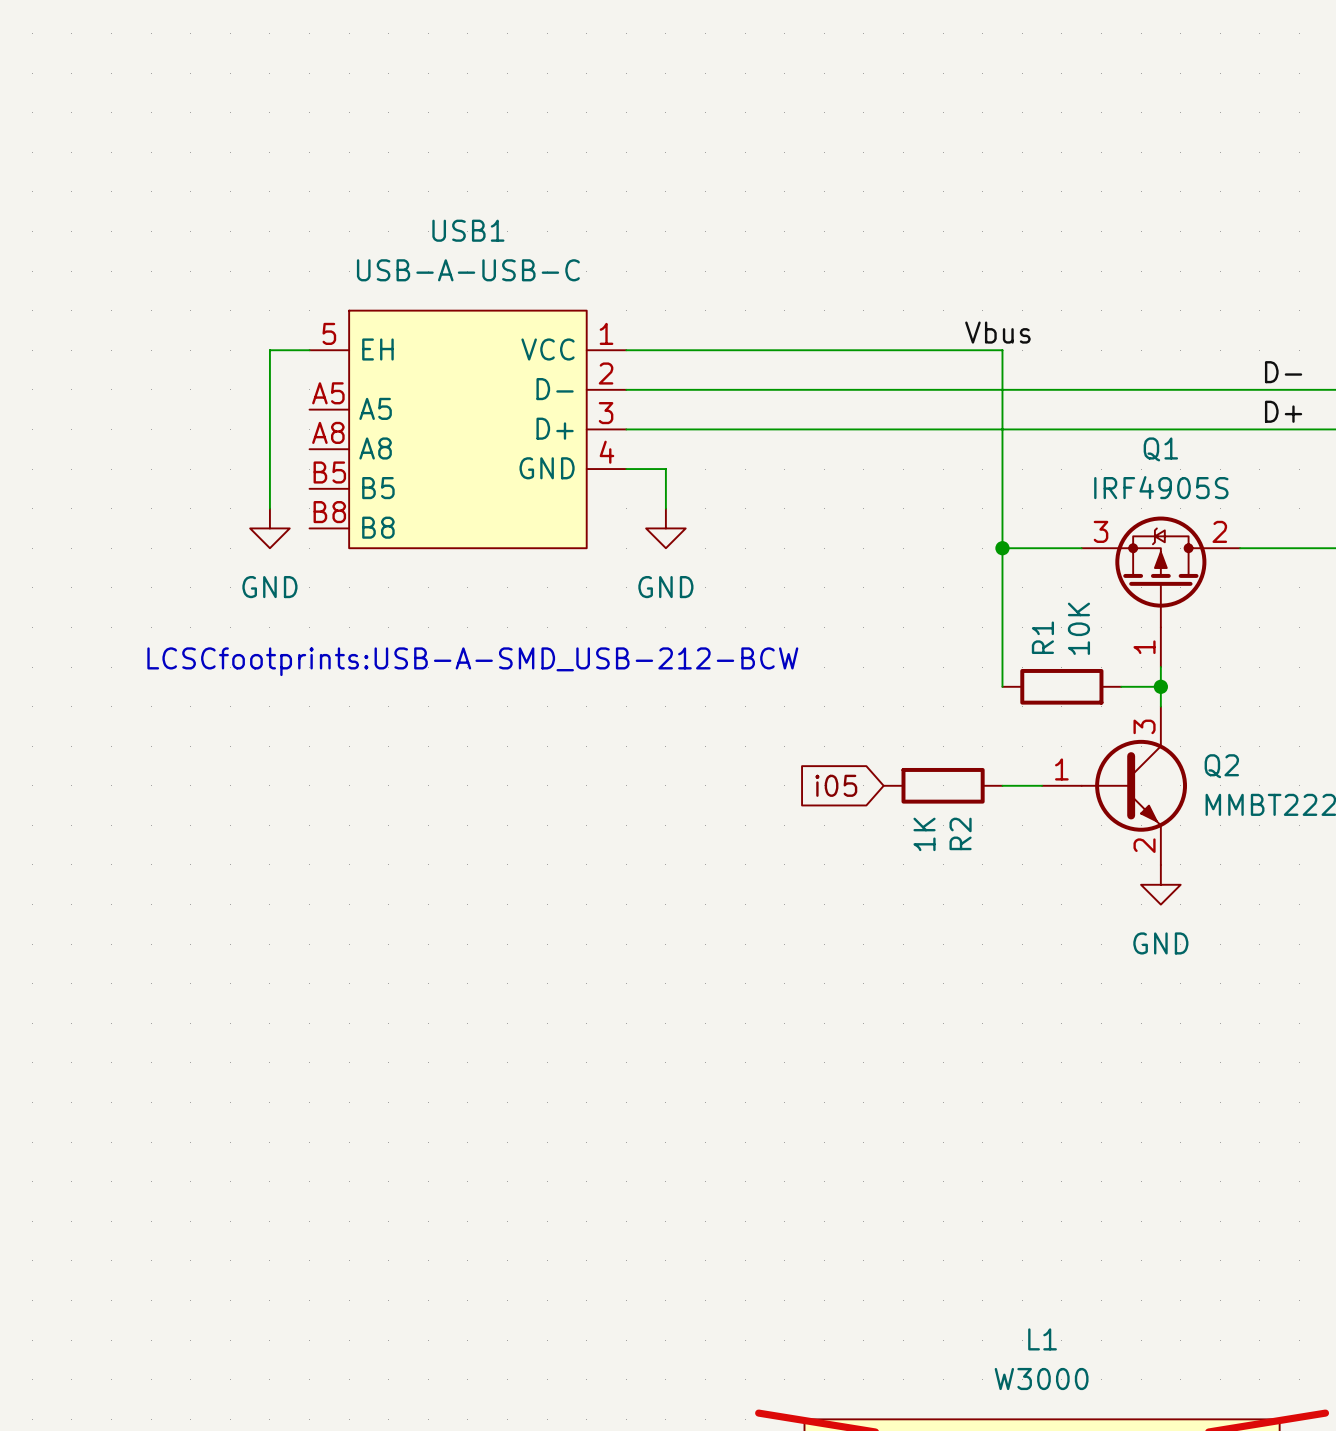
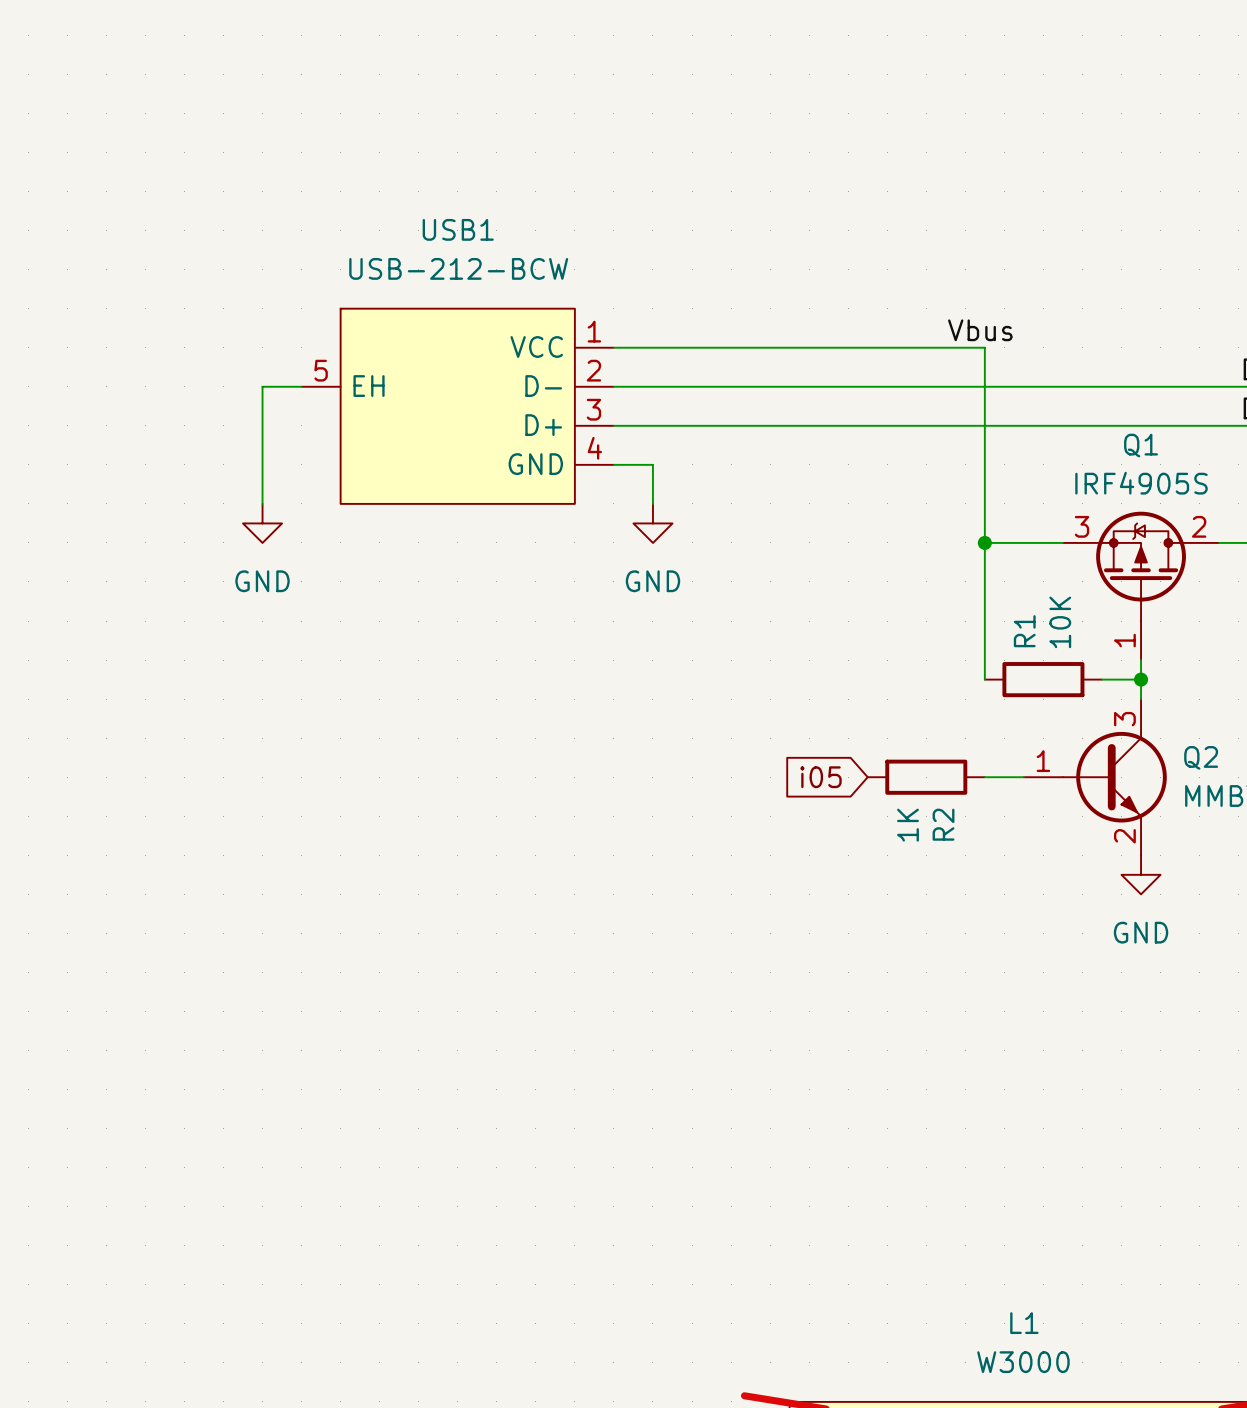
USB1 value: USB-A-USB-C (468, 270) -> USB-212-BCW (458, 268)
USB1 symbol: [309, 310, 627, 549] -> [301, 308, 614, 504]
wire: (309, 350) (269, 350) (269, 389) -> (301, 386) (262, 386)
text: LCSCfootprints:USB-A-SMD_USB-212-BCW (472, 661) -> none

